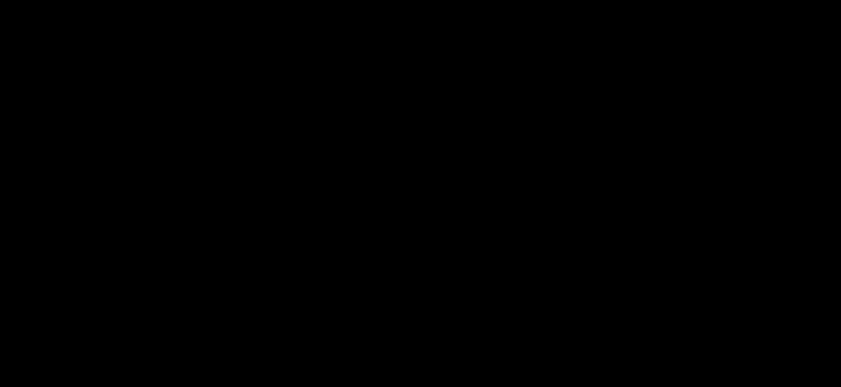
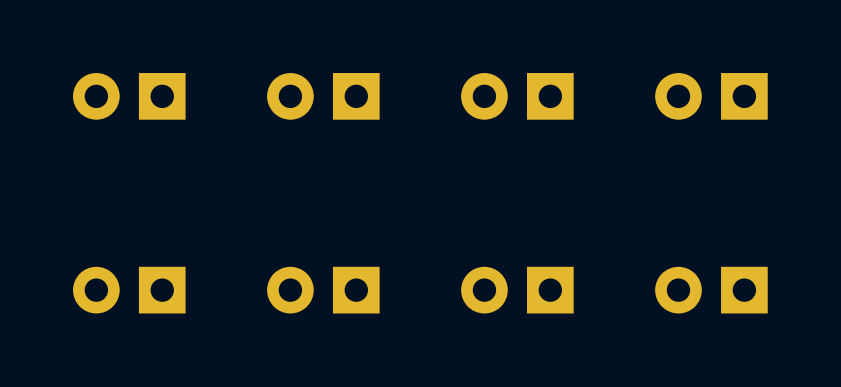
part: none -> (129, 96)
part: none -> (323, 96)
part: none -> (517, 96)
part: none -> (711, 96)
part: none -> (129, 290)
part: none -> (323, 290)
part: none -> (517, 290)
part: none -> (711, 290)

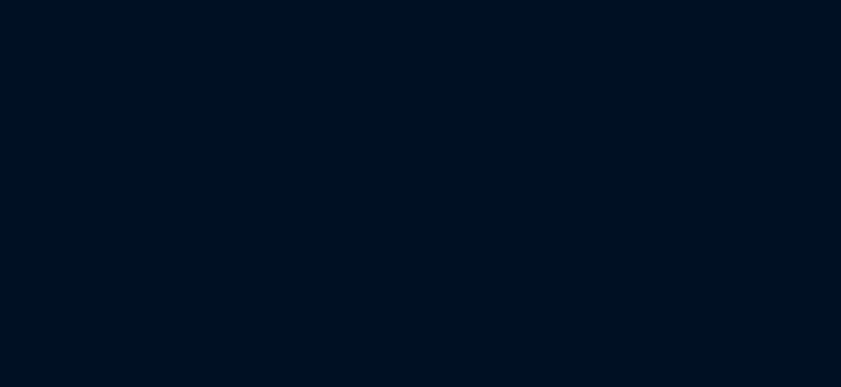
part: (129, 96) -> none
part: (323, 96) -> none
part: (517, 96) -> none
part: (711, 96) -> none
part: (129, 290) -> none
part: (323, 290) -> none
part: (517, 290) -> none
part: (711, 290) -> none

